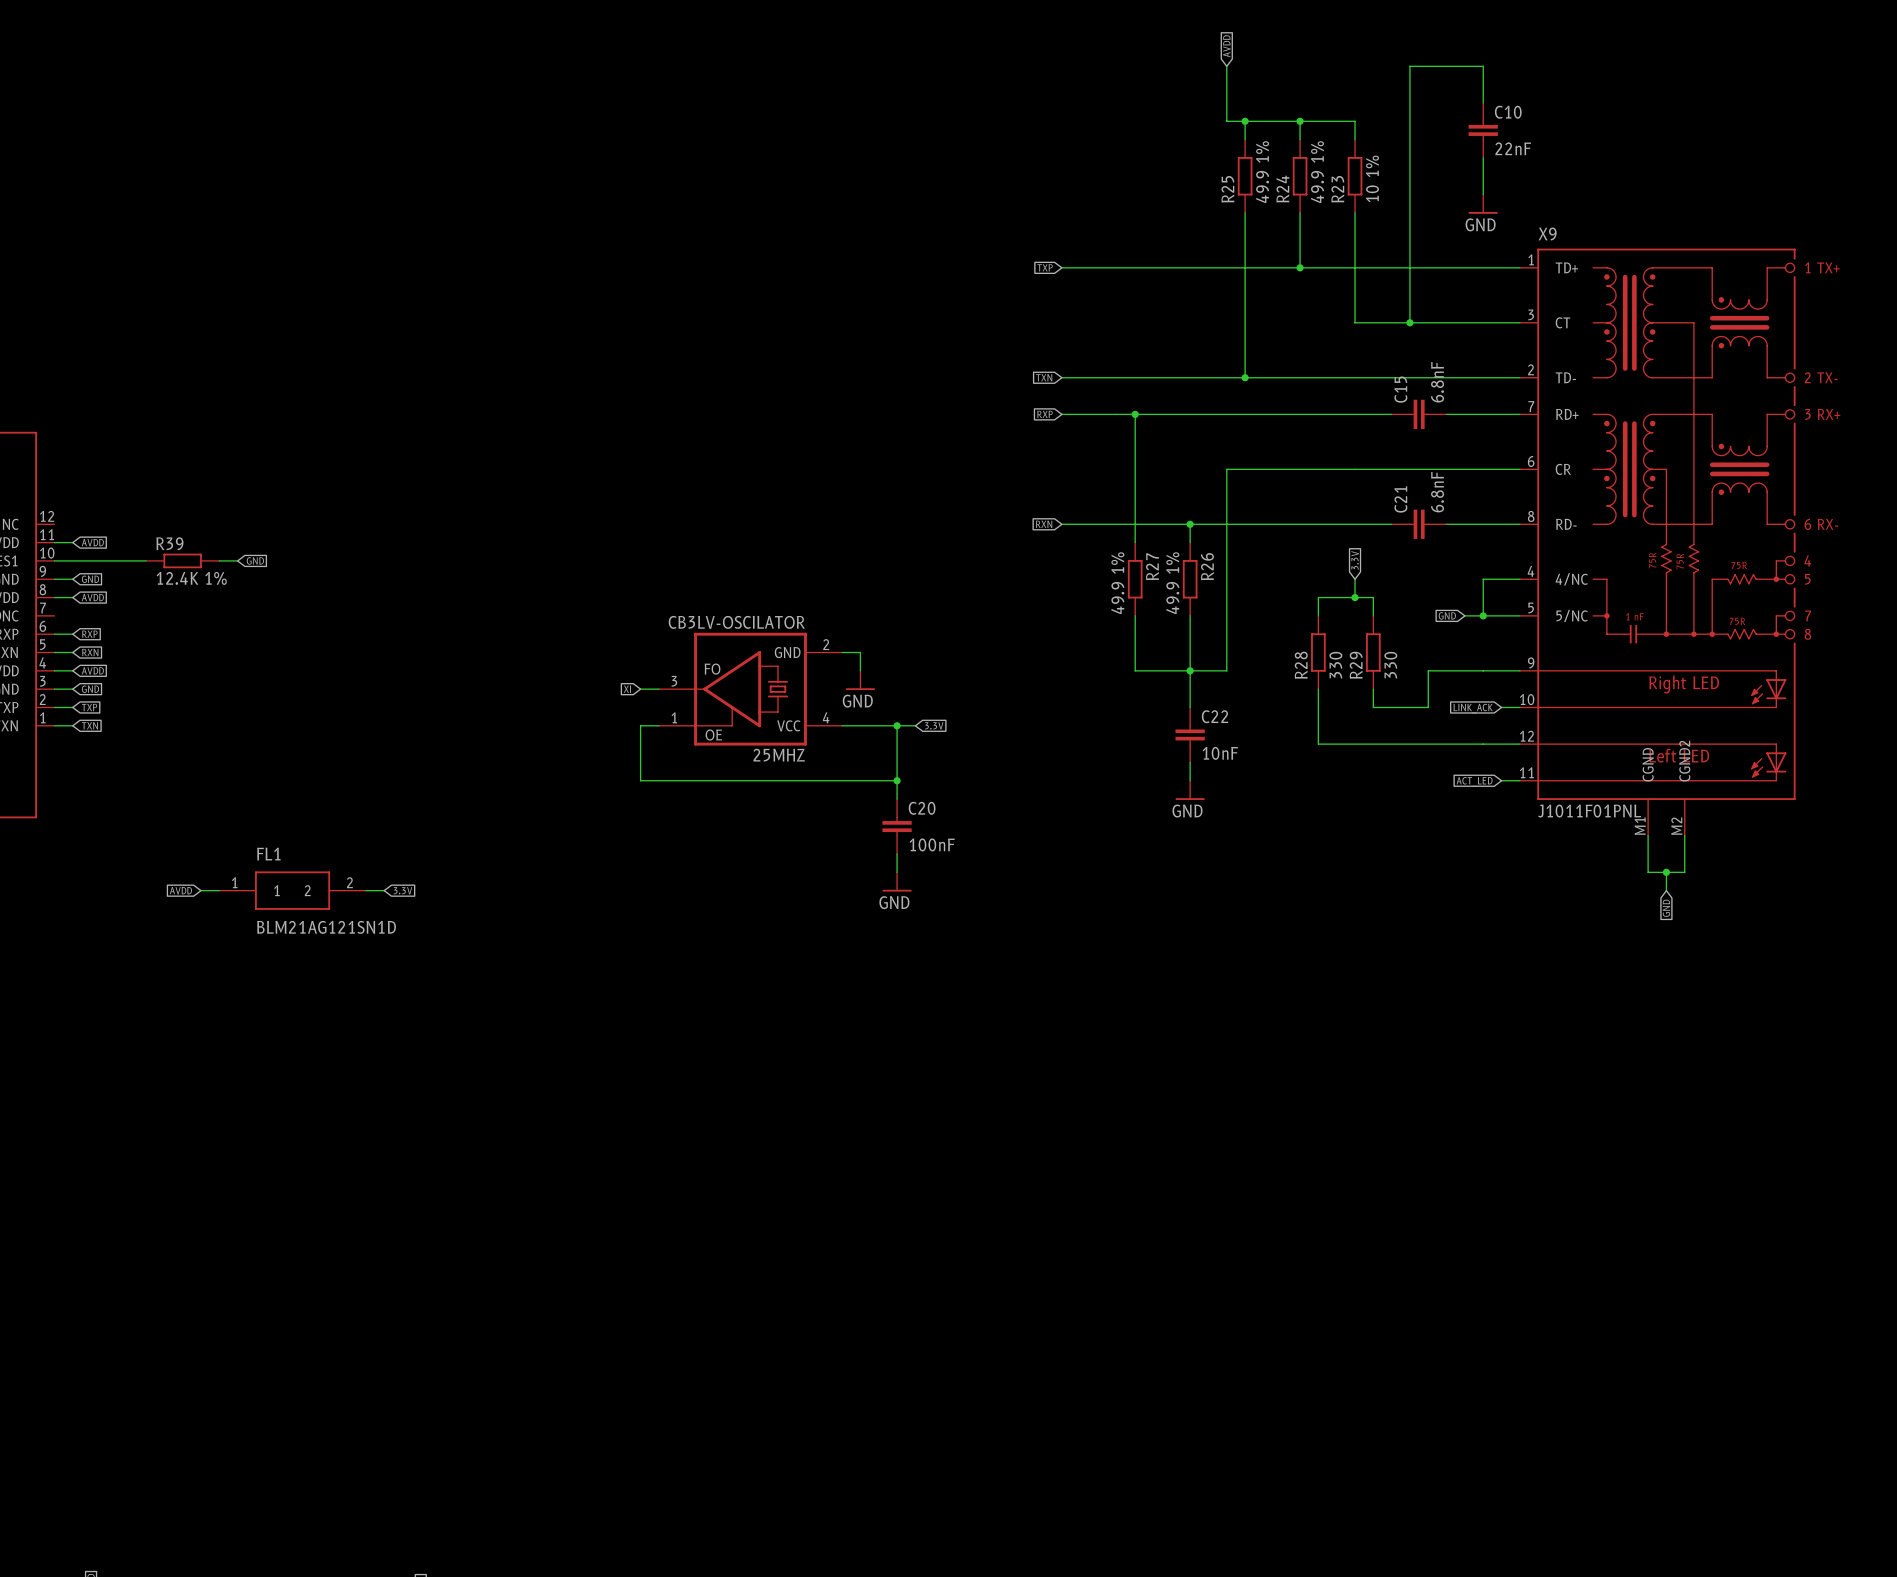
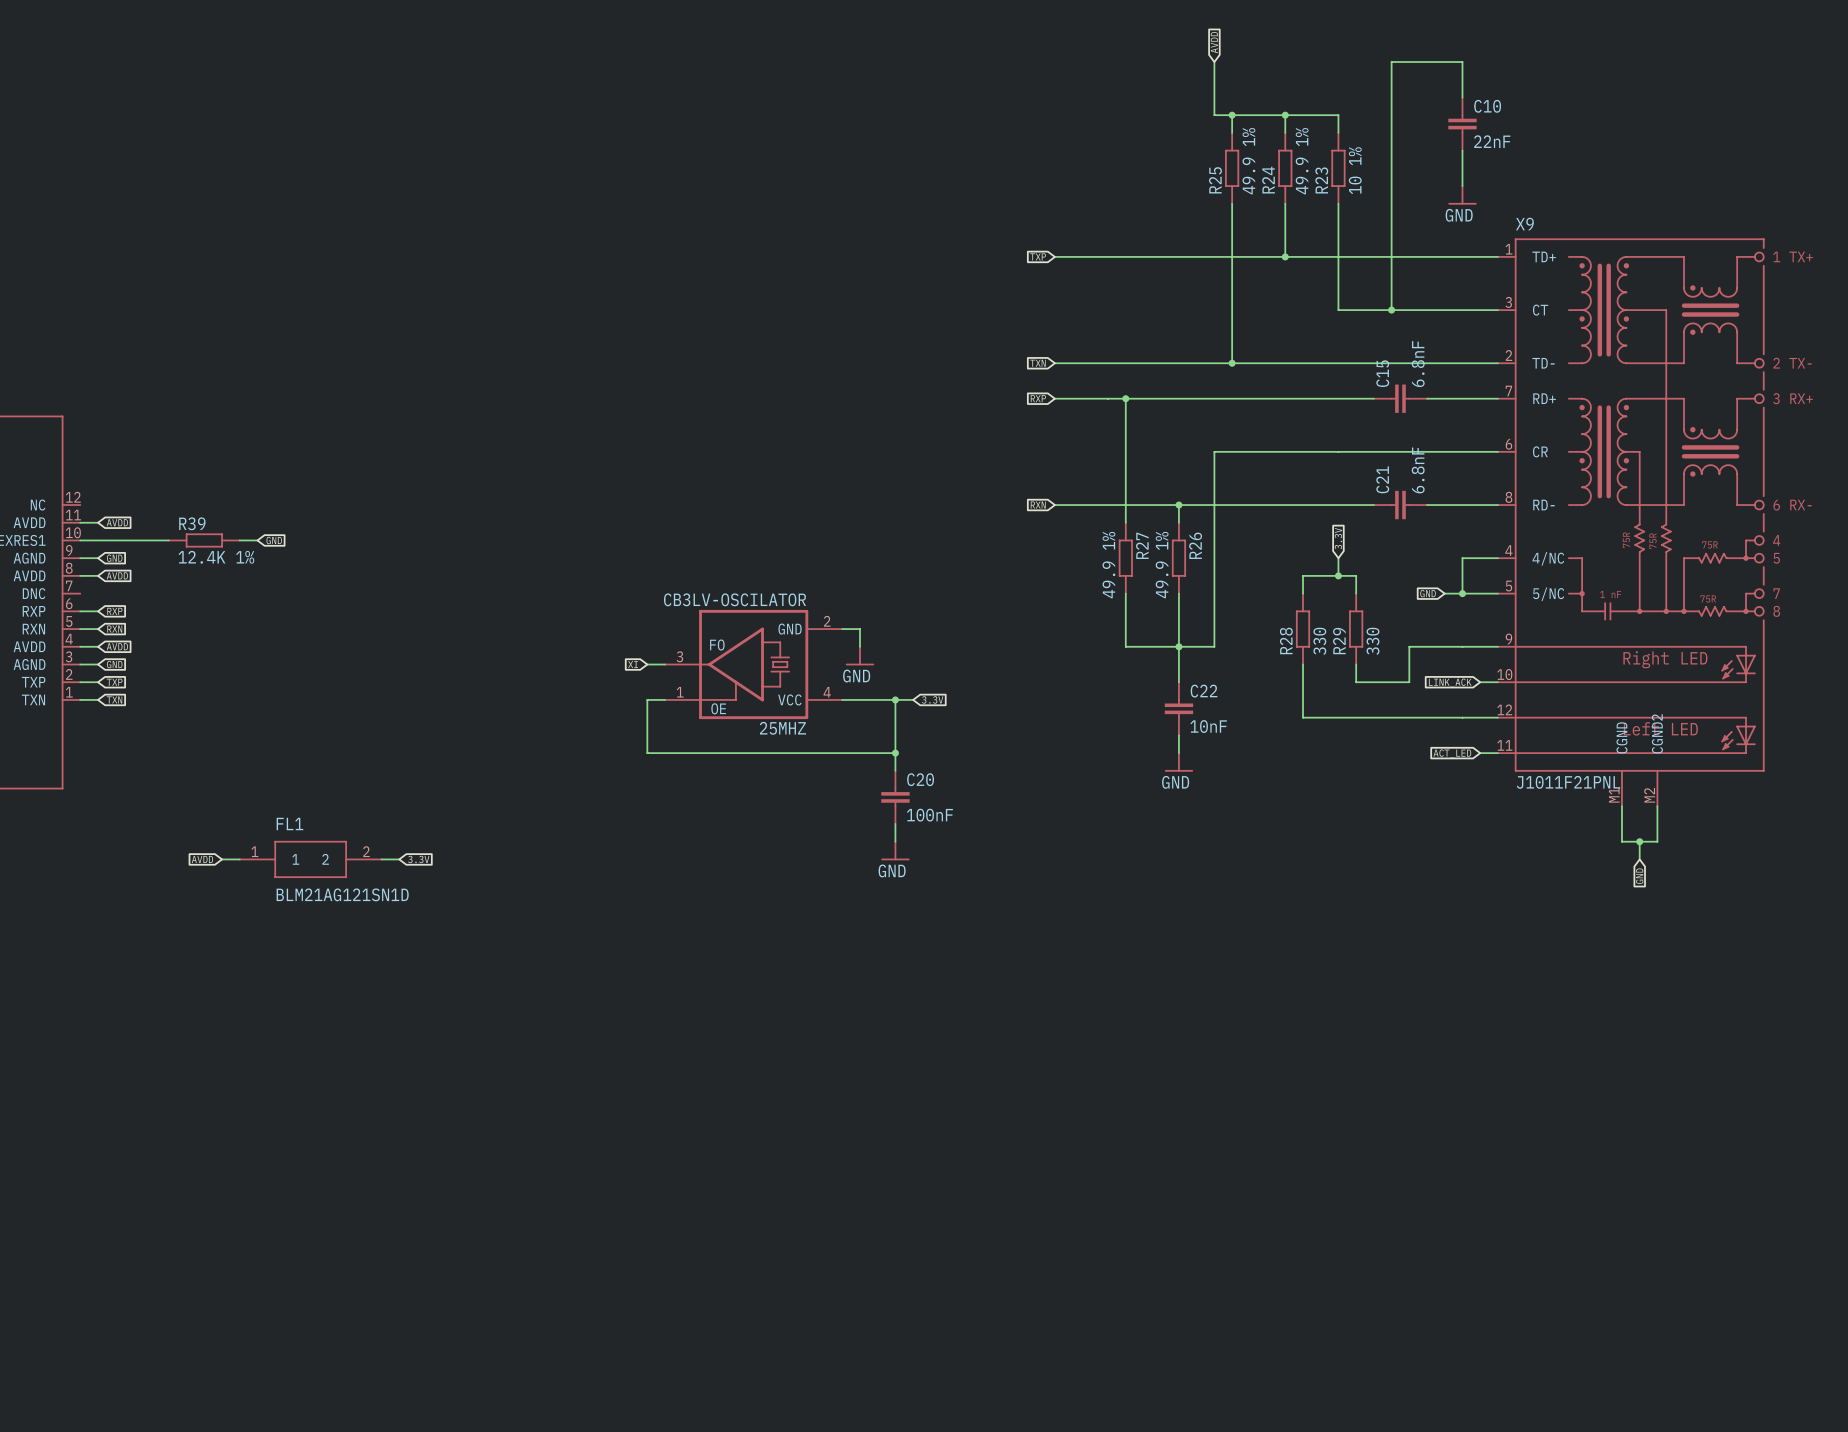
X9 value: J1011F01PNL (1589, 811) -> J1011F21PNL (1568, 782)

